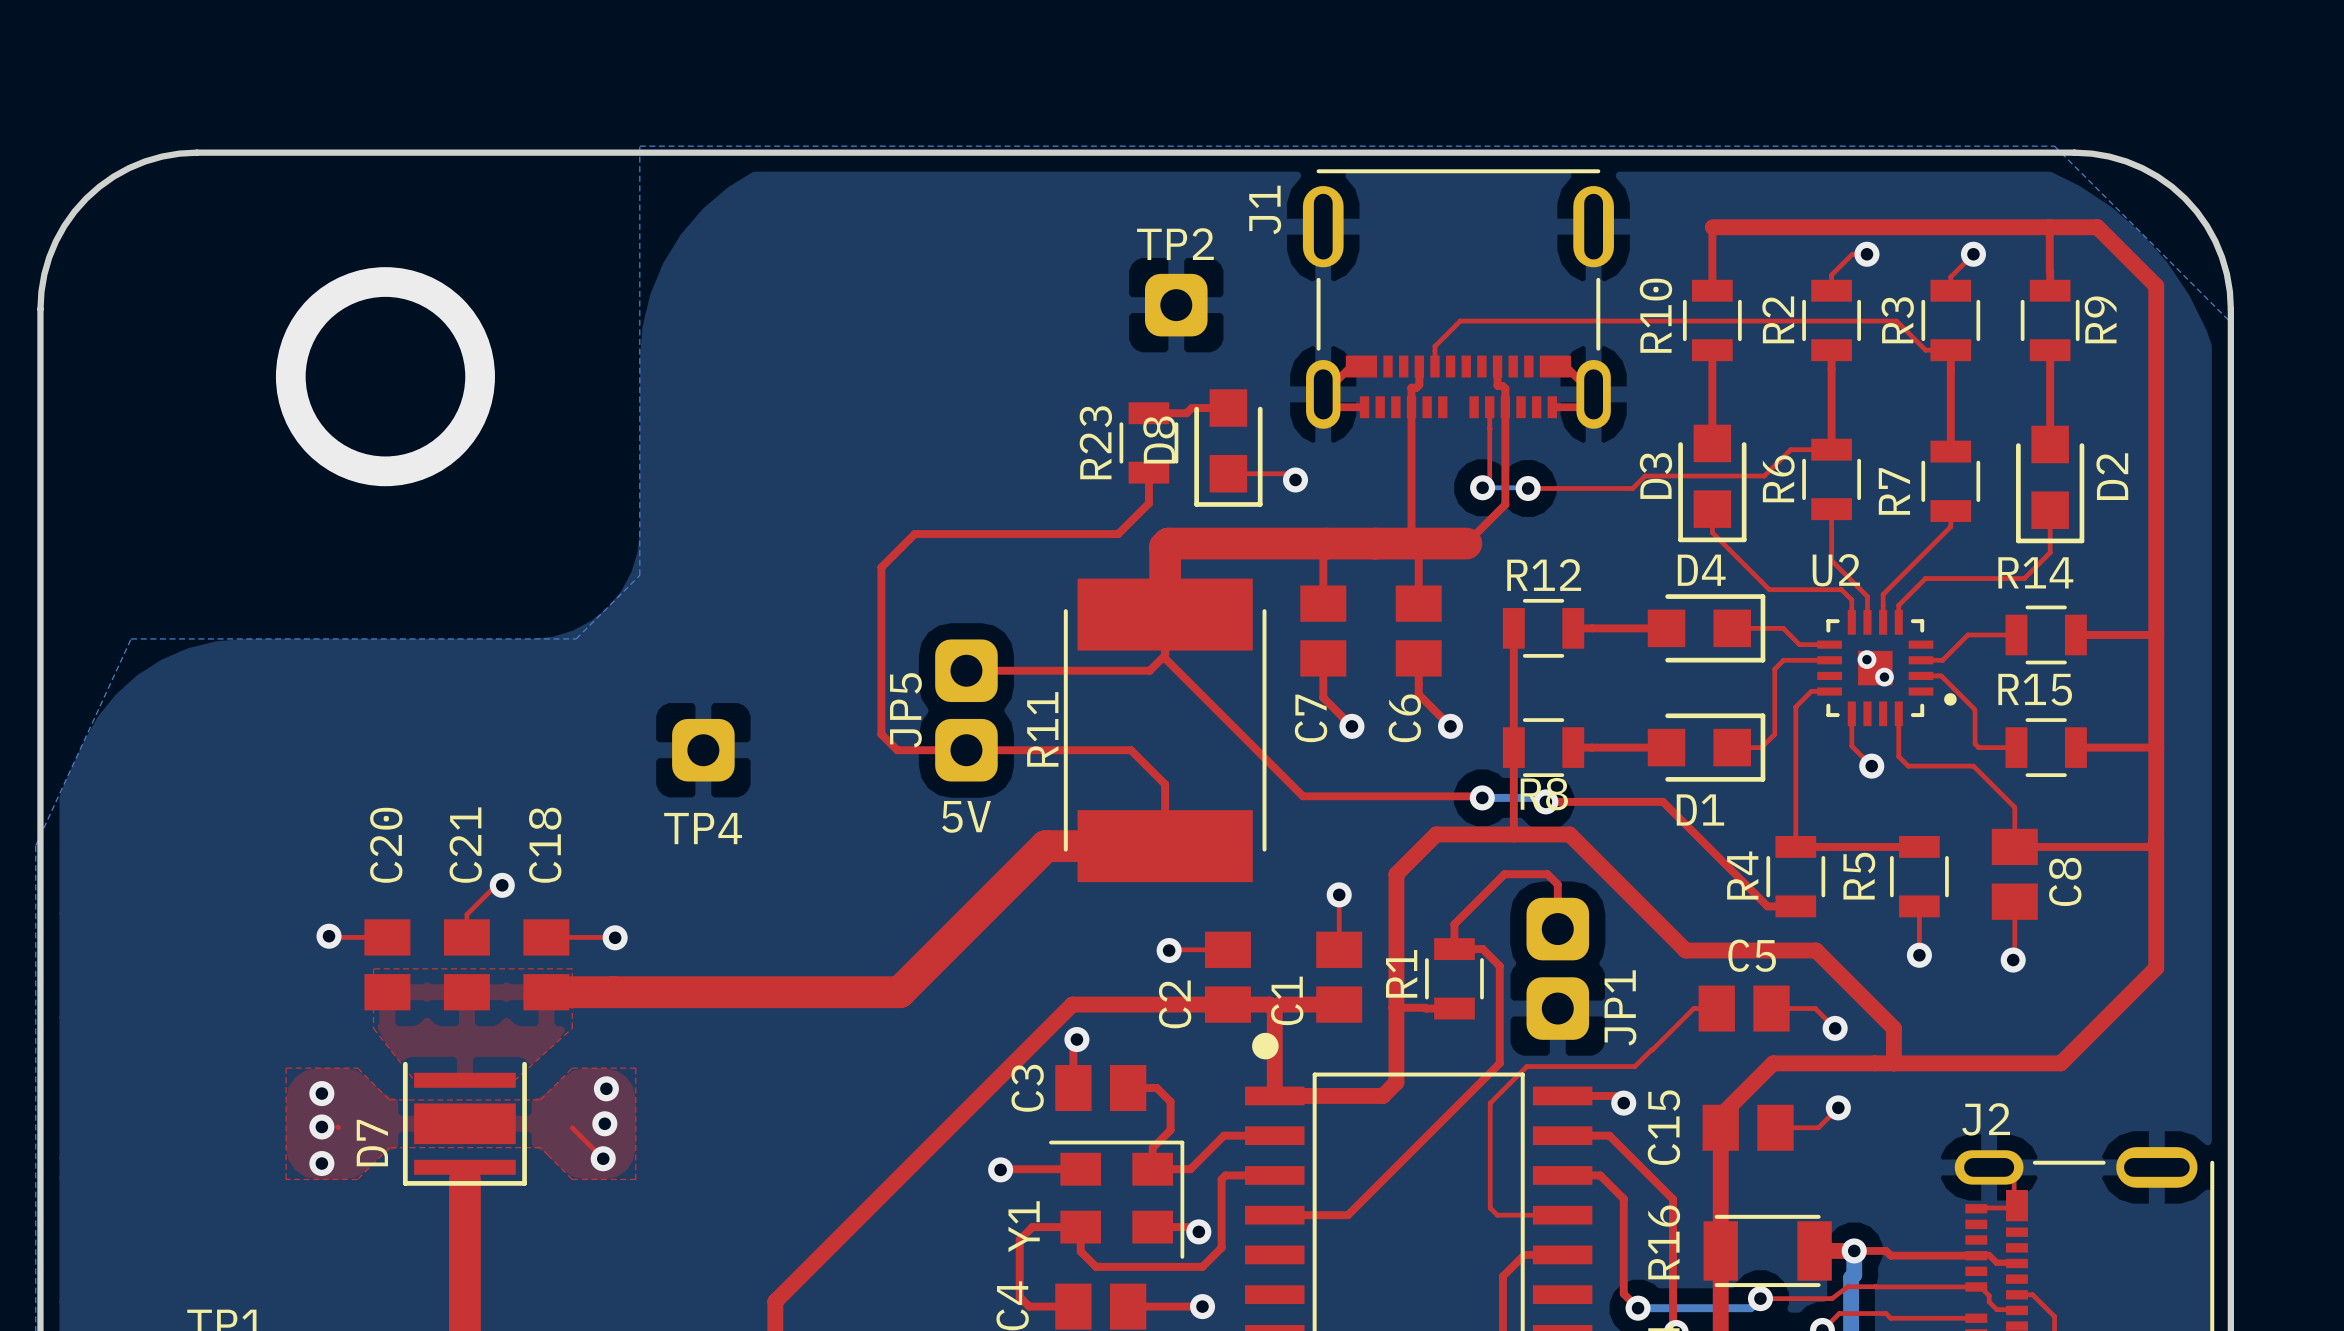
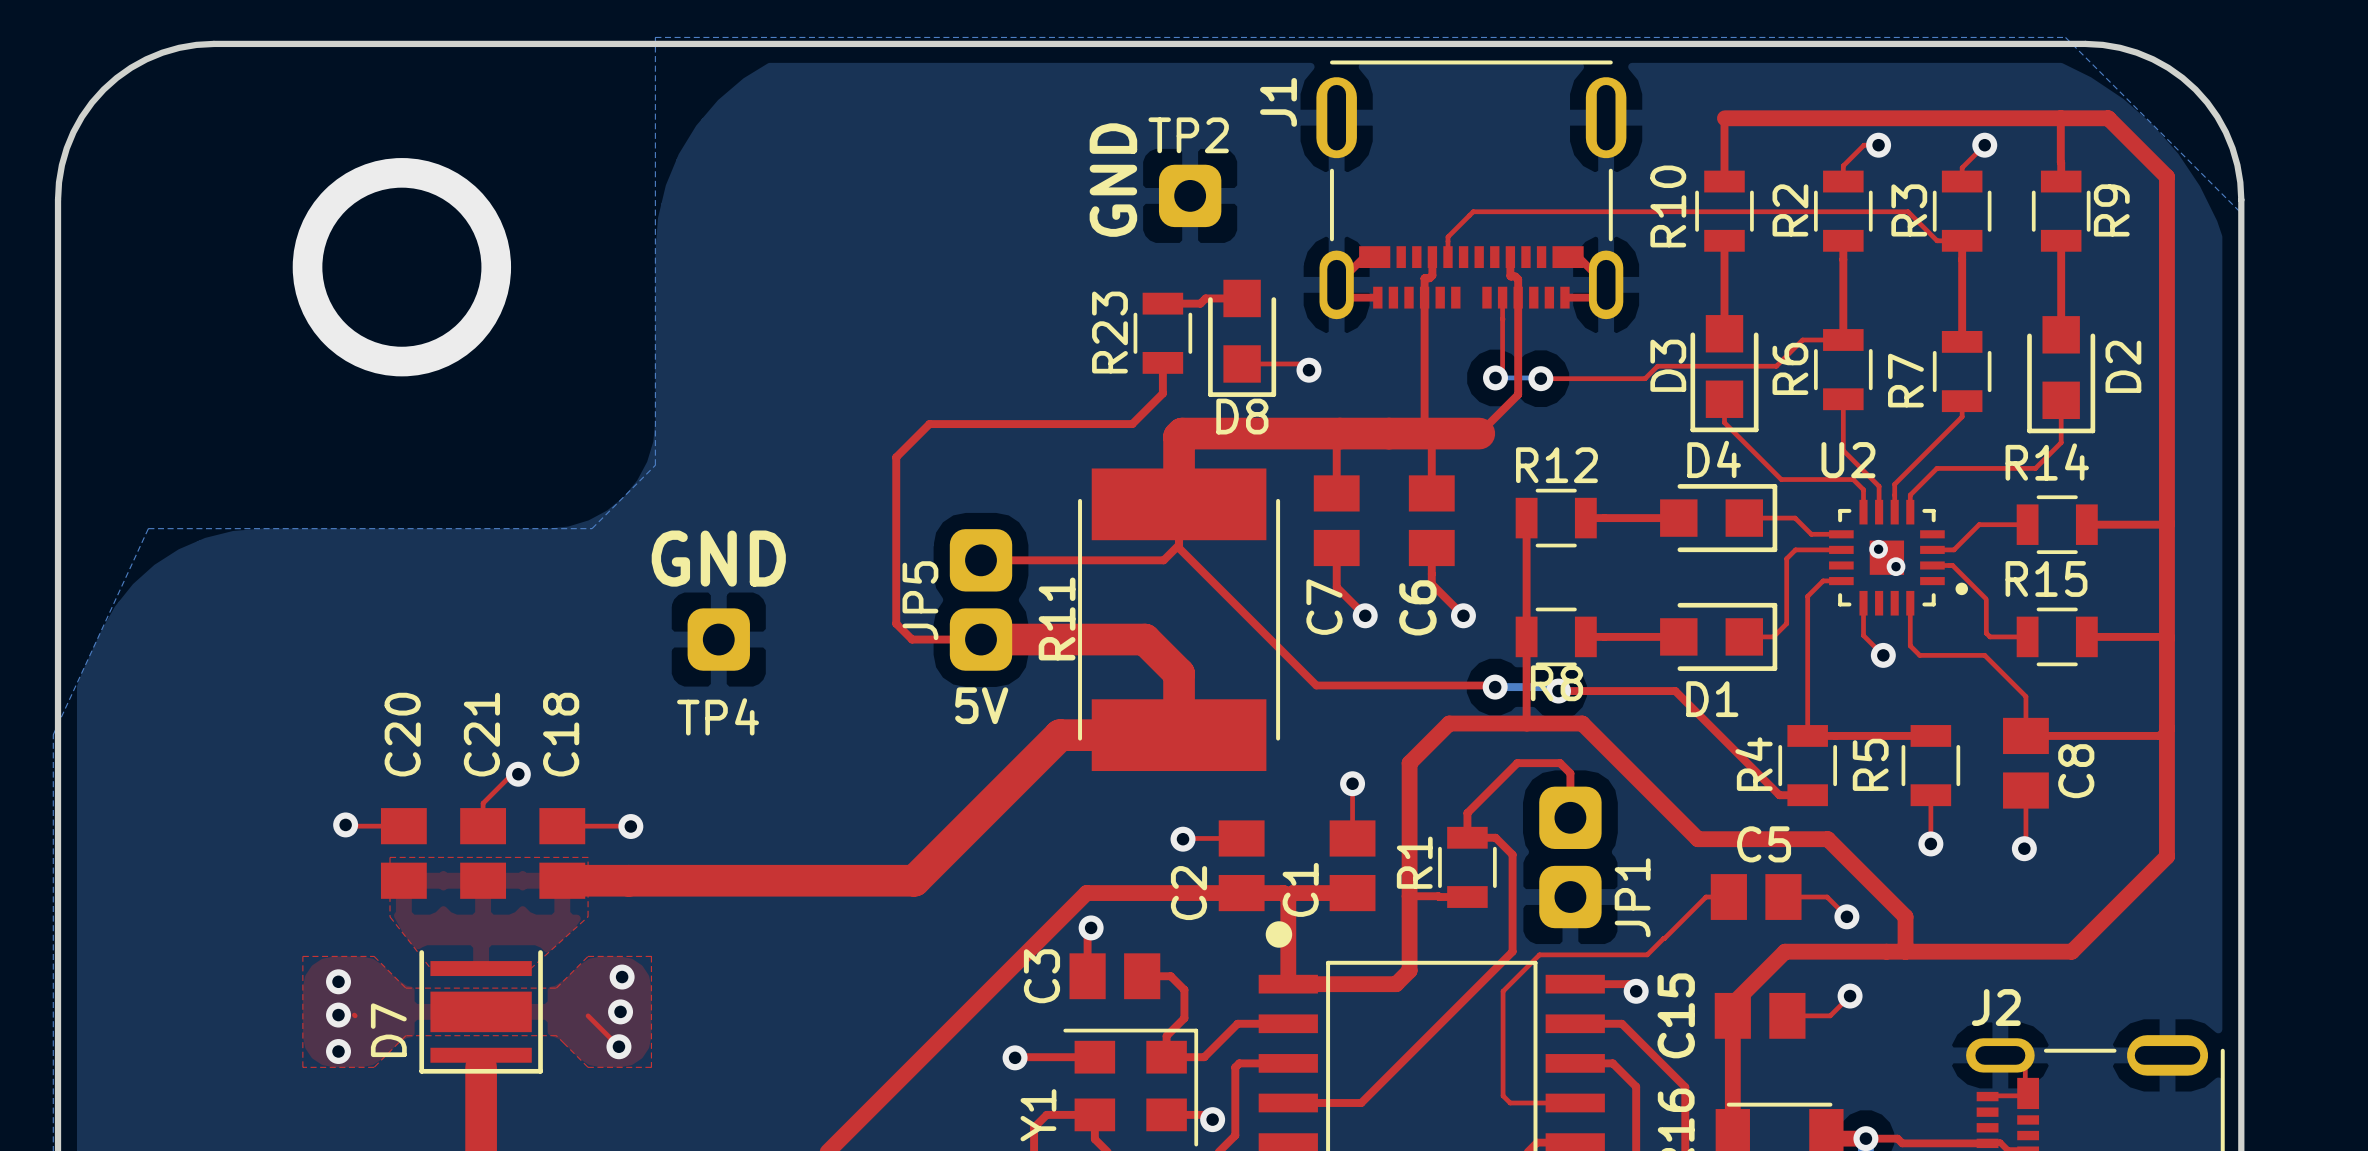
text: none -> GND (1113, 180)
D8 name rotation: 0° (1159, 439) -> 90° clockwise (1242, 416)
D8 name position: D8 (1159, 439) -> D8 (1242, 416)
text: none -> GND (718, 558)
top track width: thin (966, 750) (1130, 750) (1165, 784) (1165, 846) -> thick (981, 639) (1144, 639) (1179, 673) (1179, 735)

